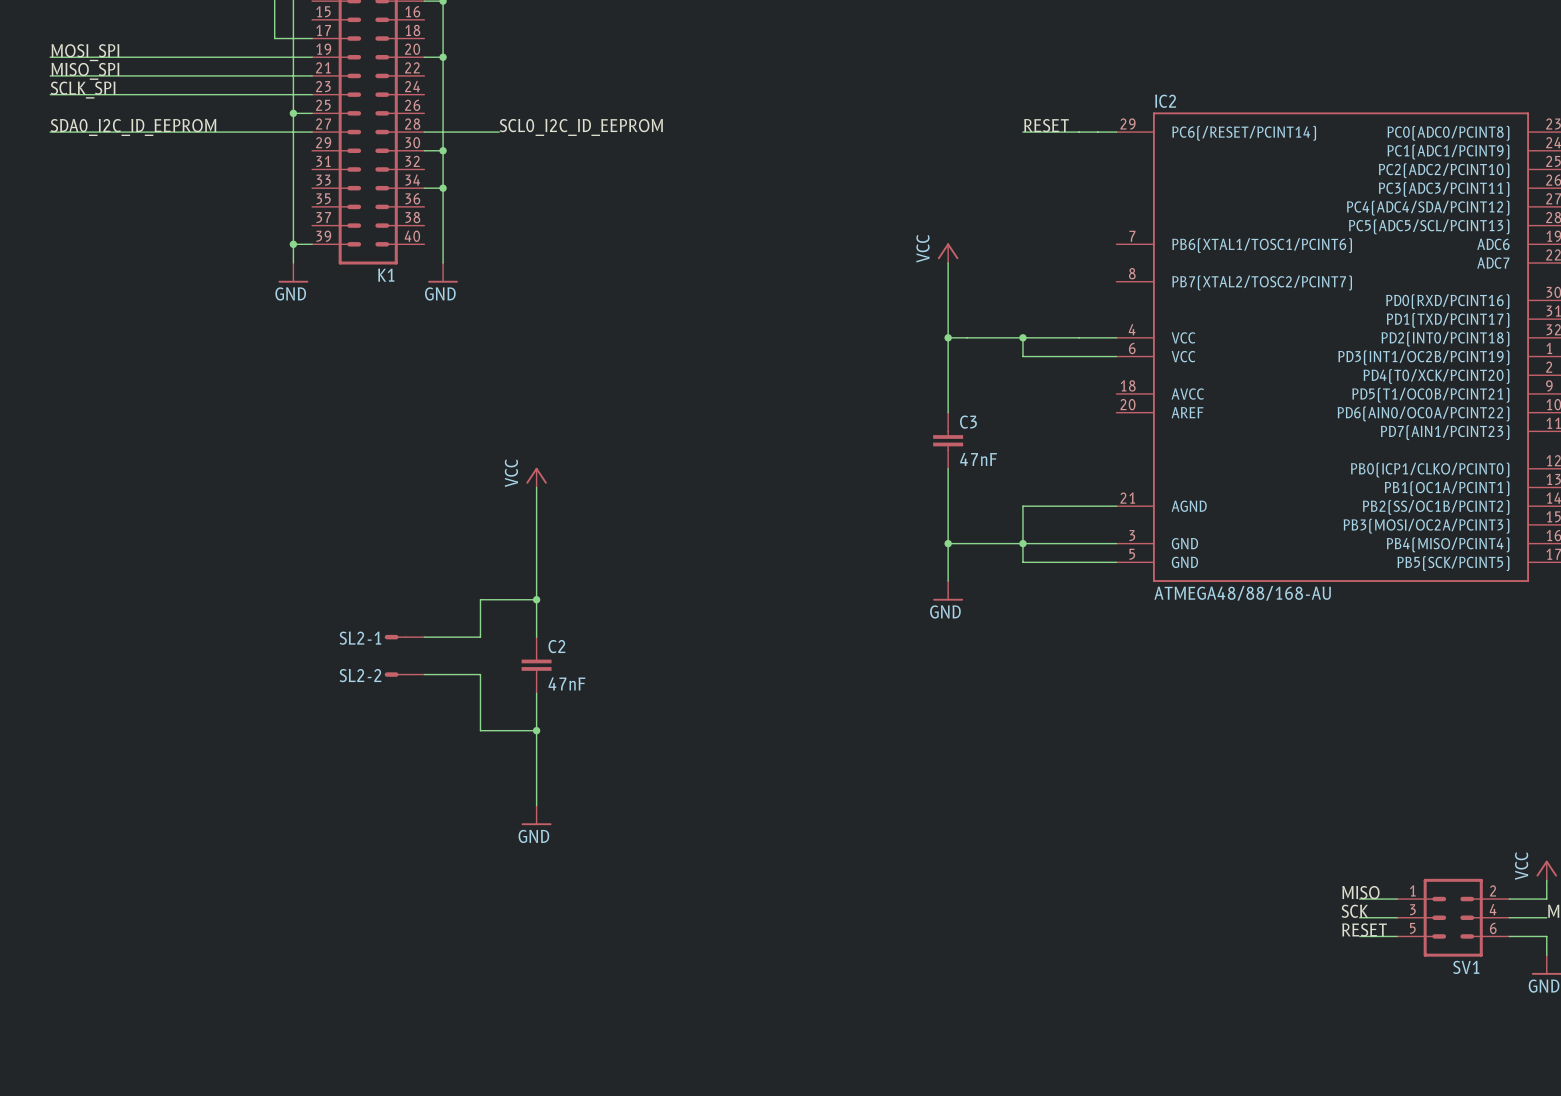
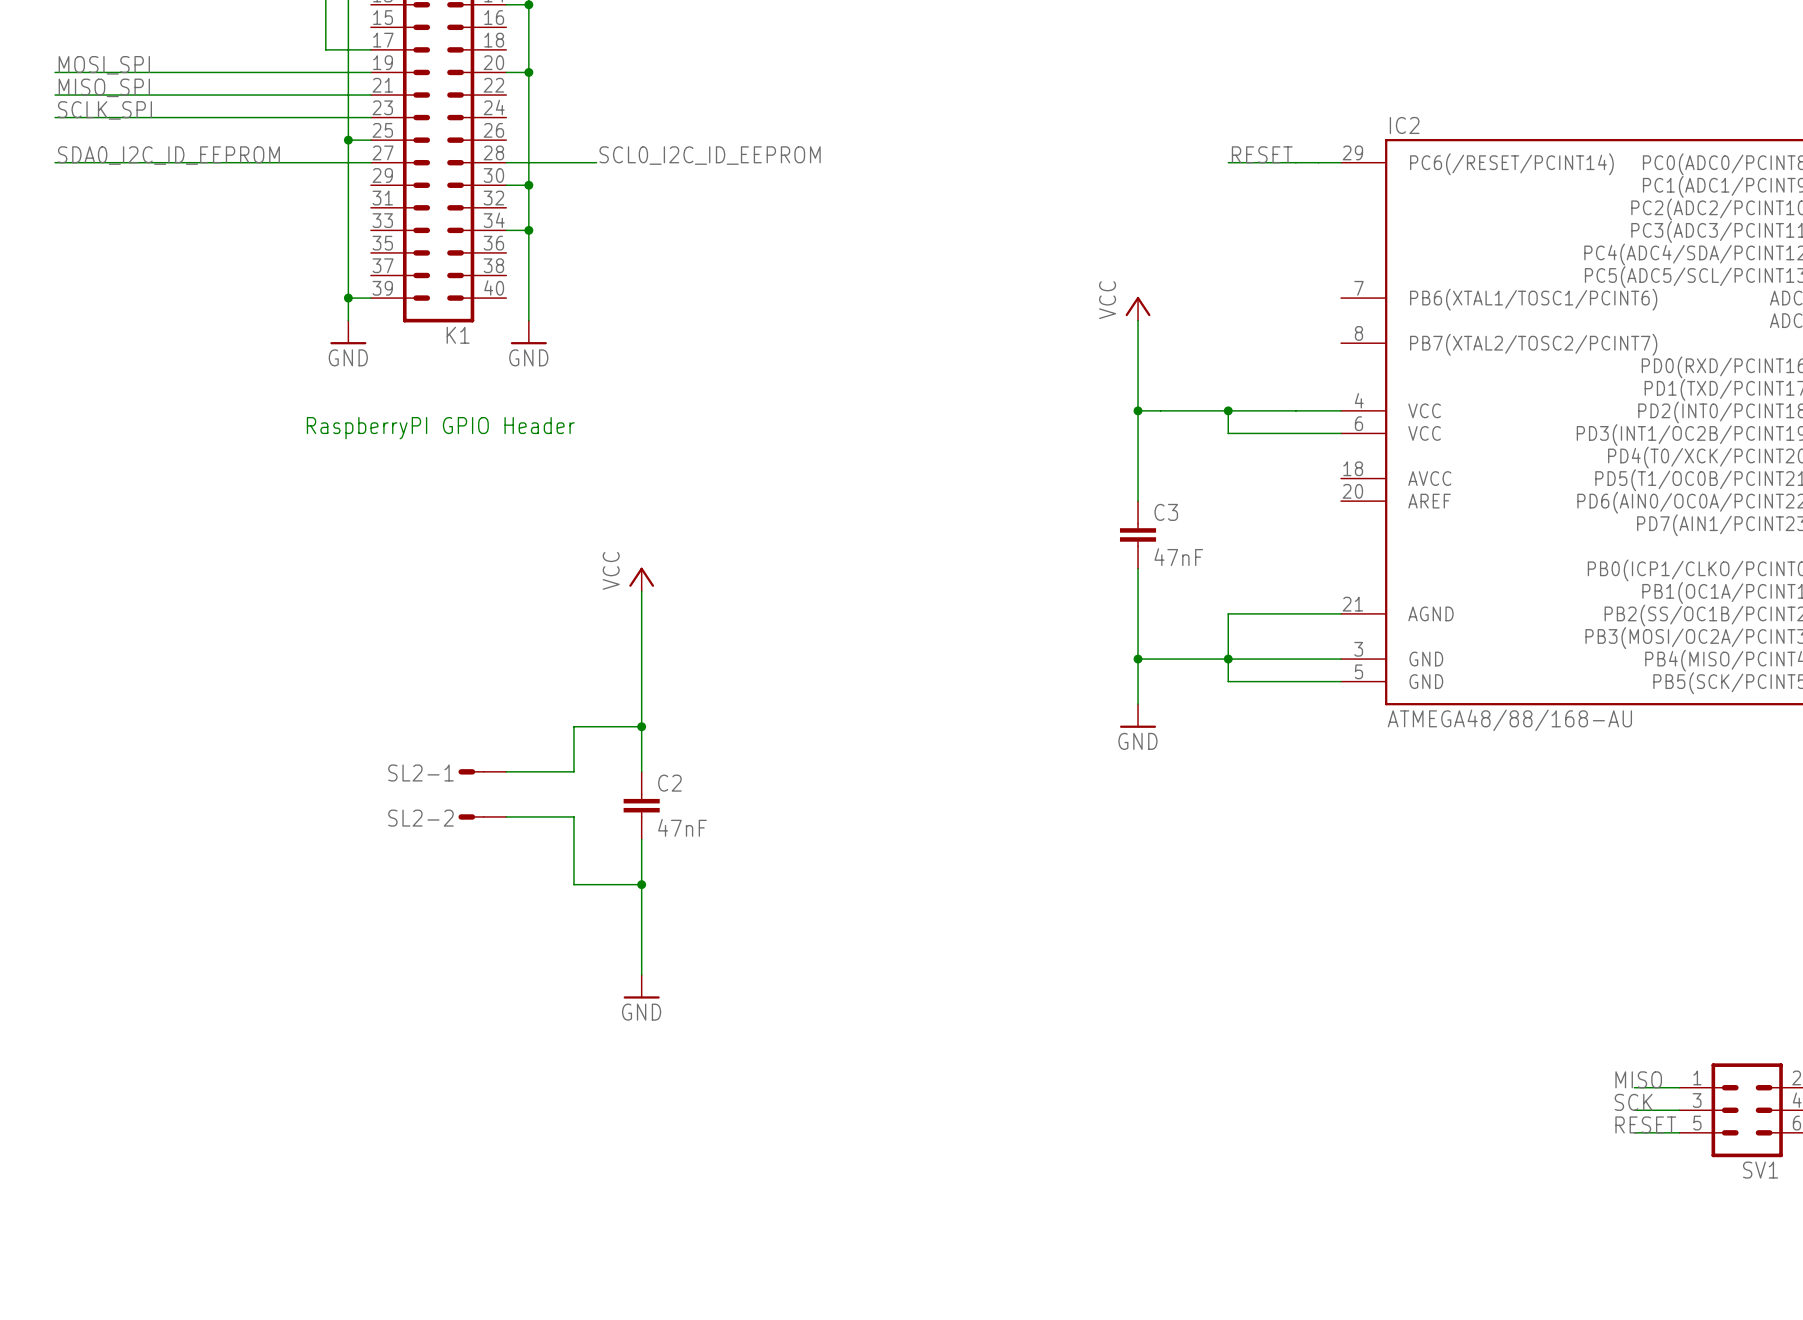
text: none -> RaspberryPI GPIO Header (440, 428)

